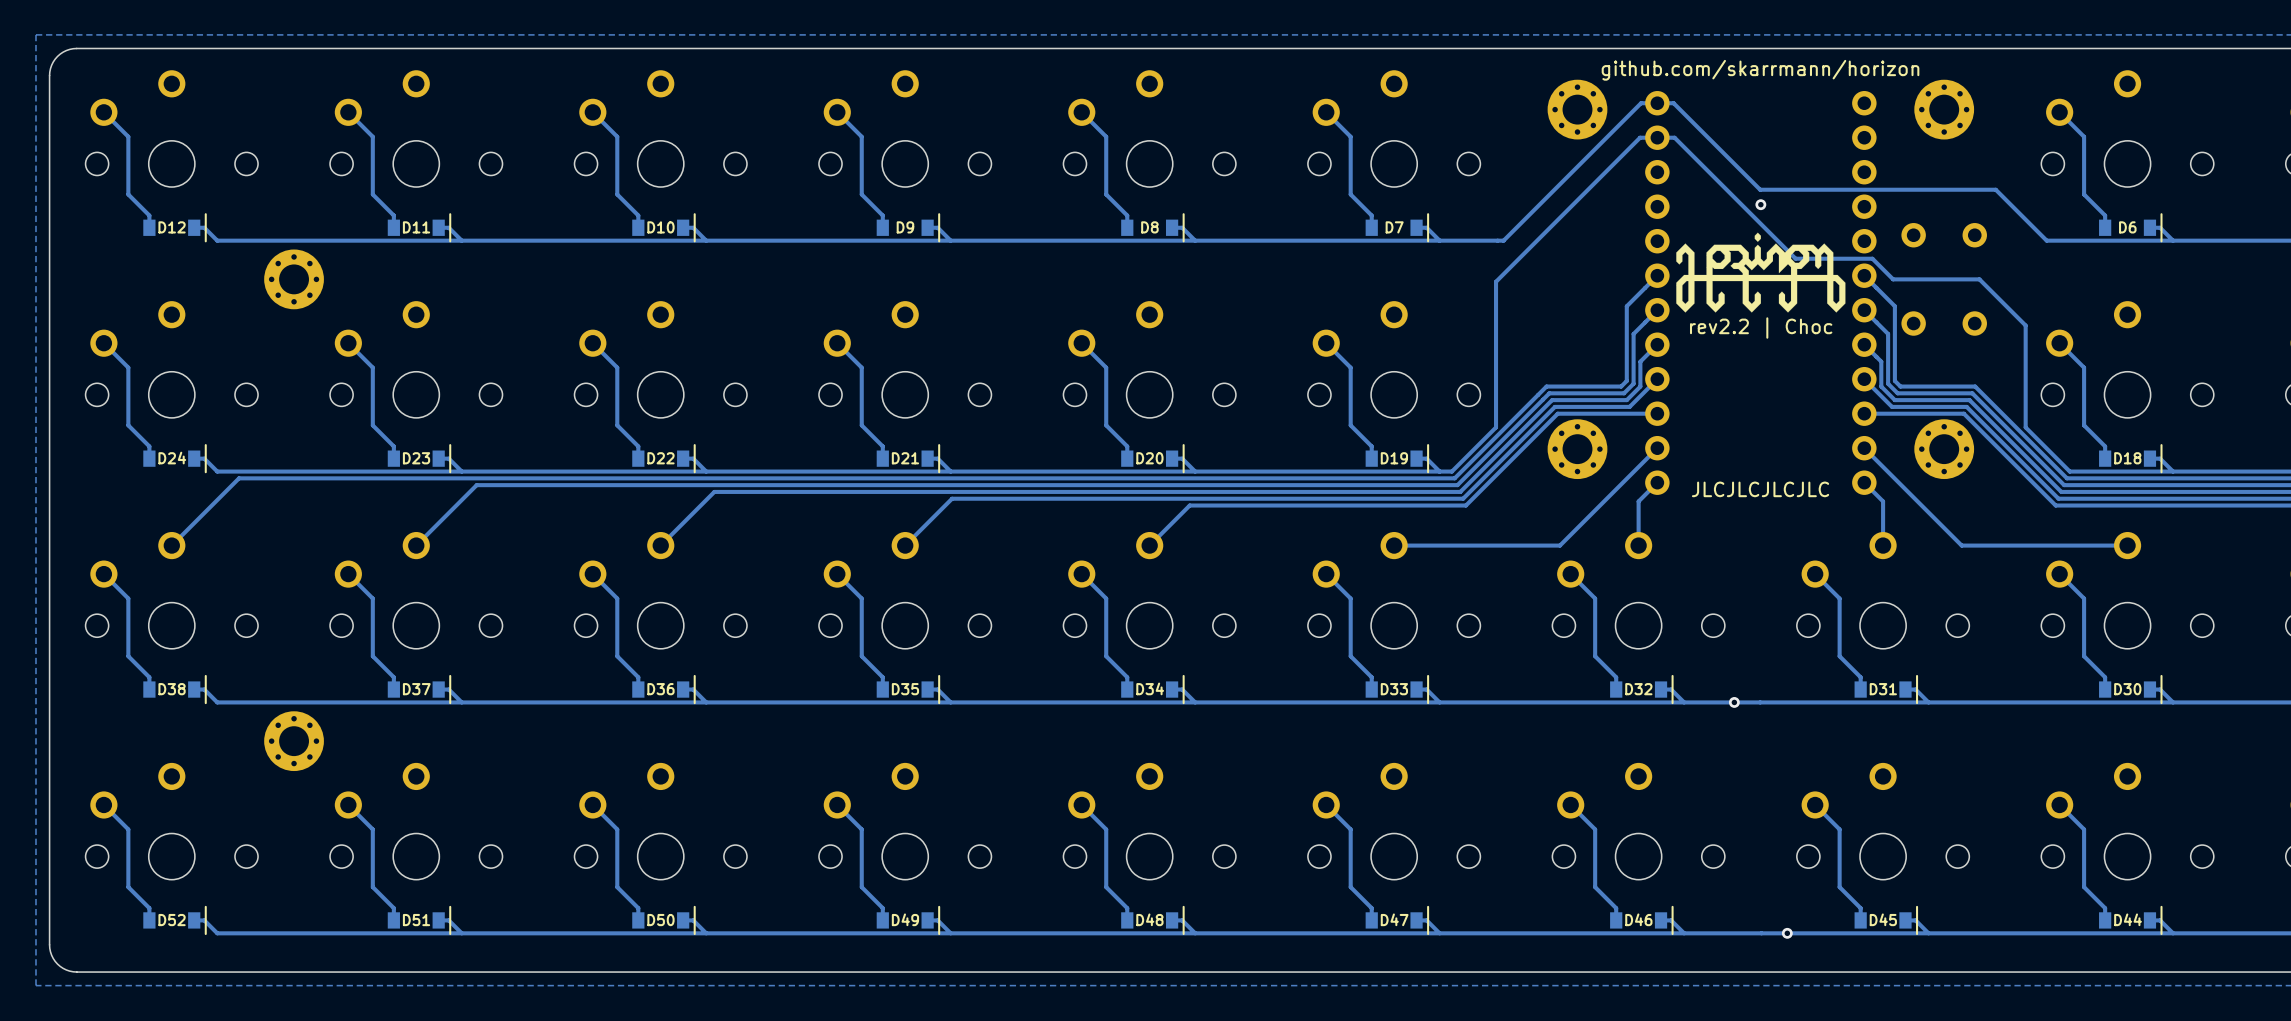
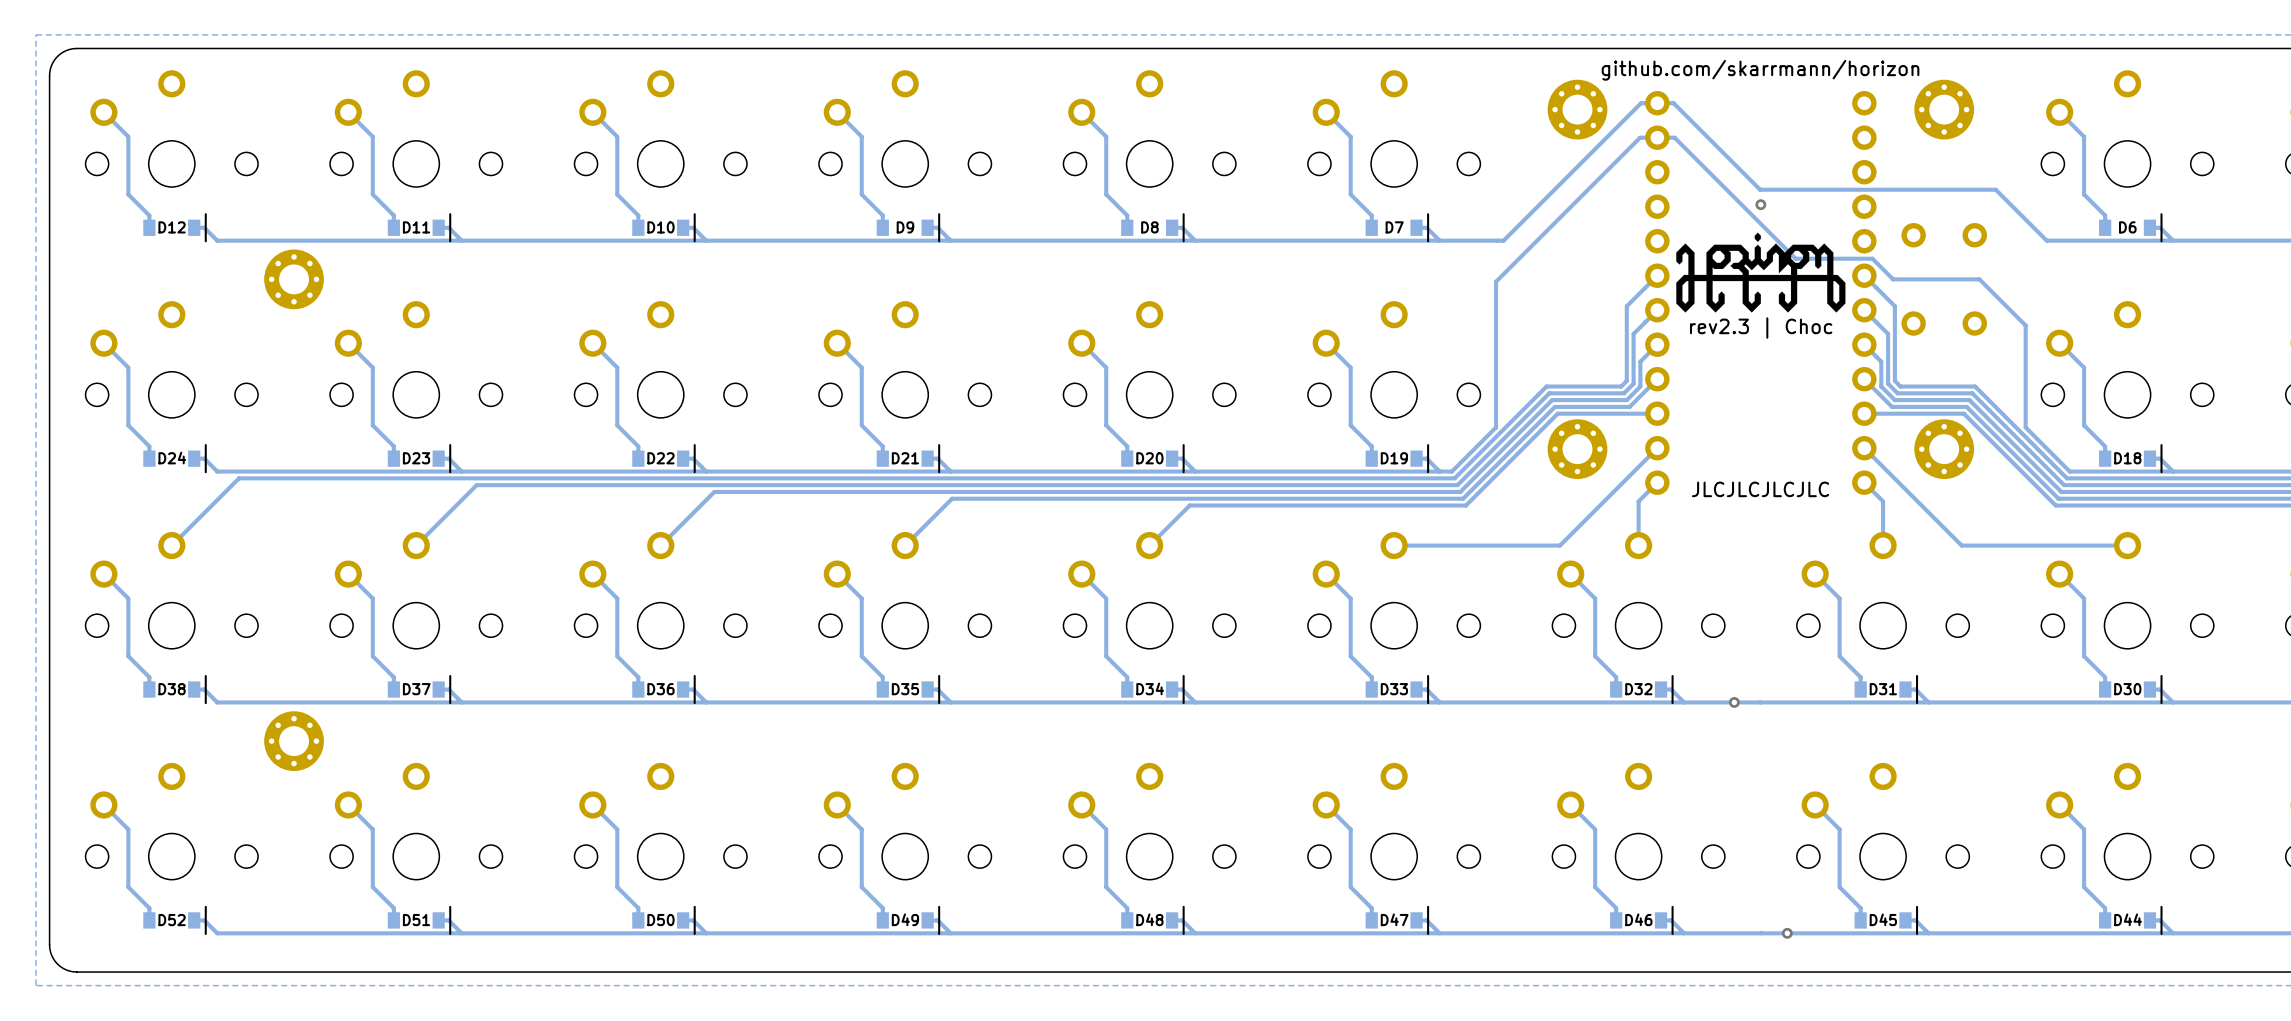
text: rev2.2 | Choc (1761, 328) -> rev2.3 | Choc (1761, 328)

